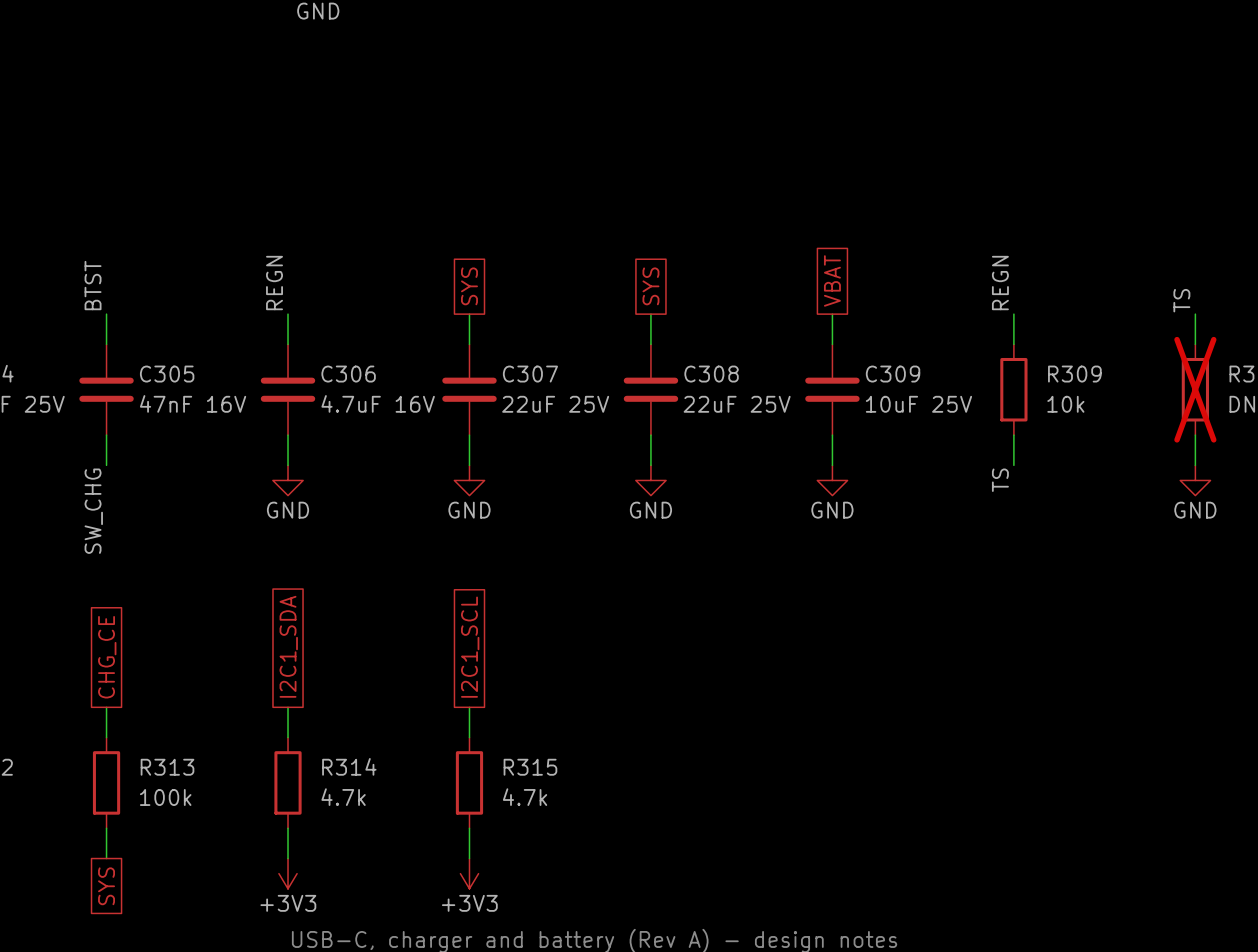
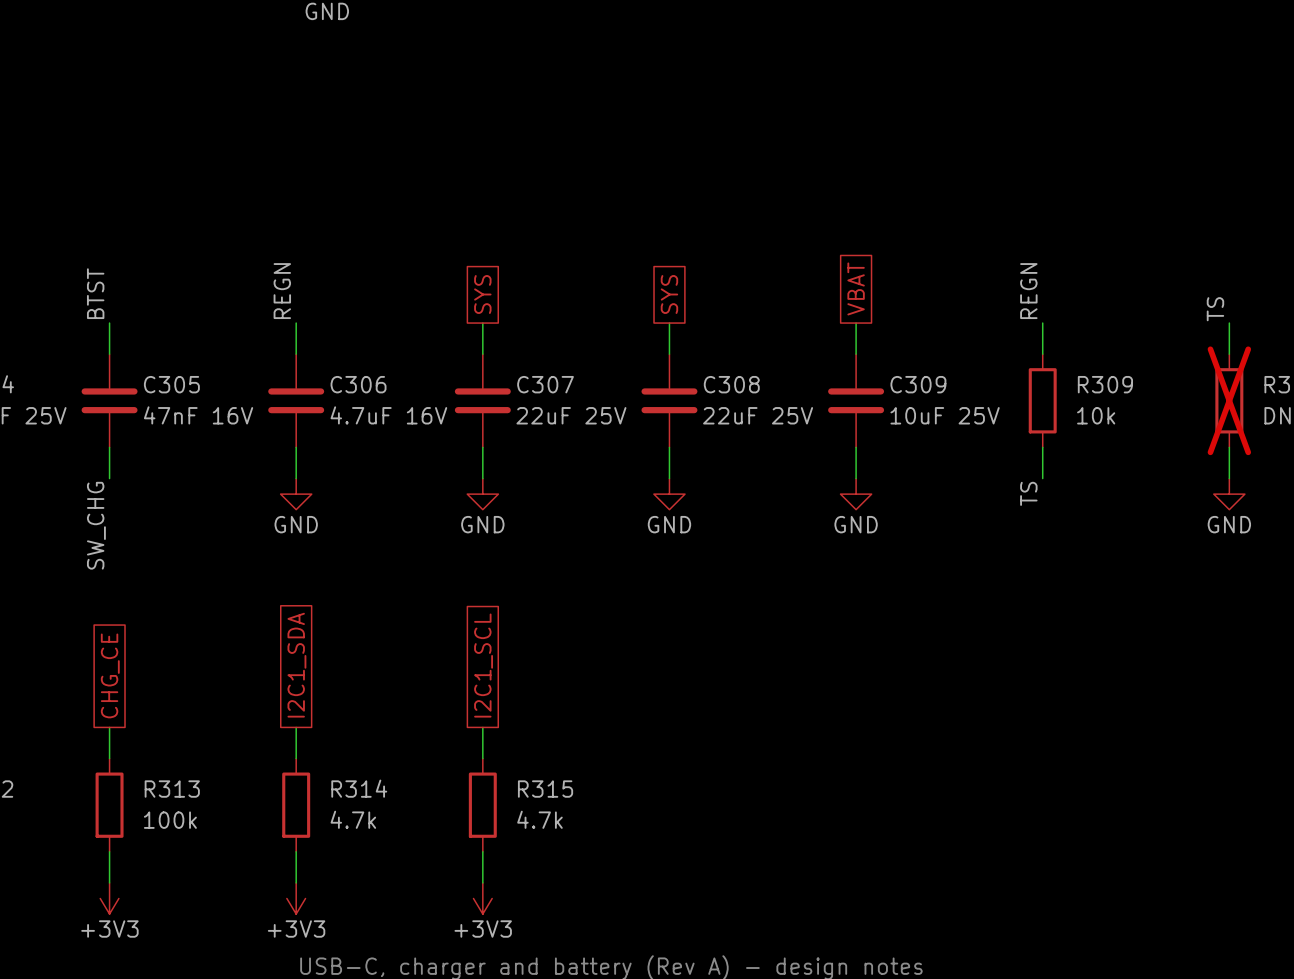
power symbol: none -> +3V3 (109, 898)
global label: SYS (106, 886) -> none

